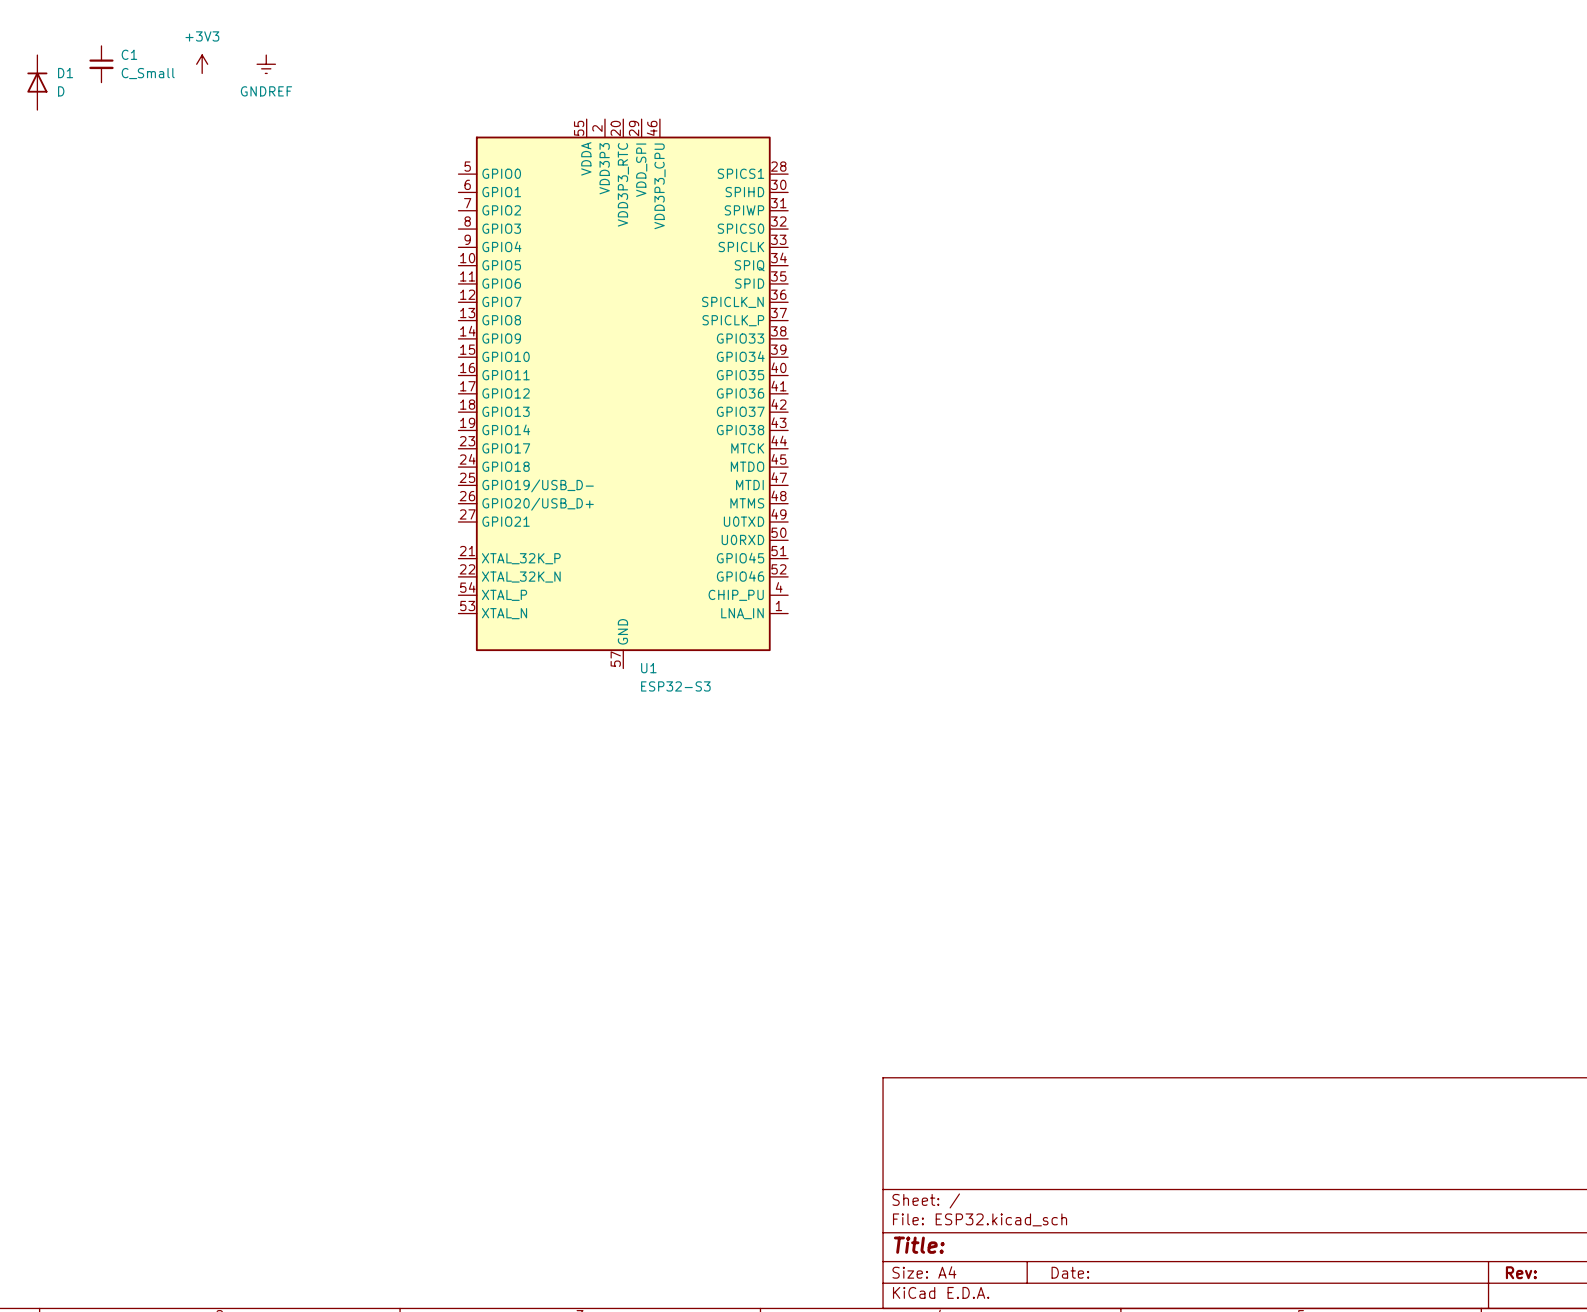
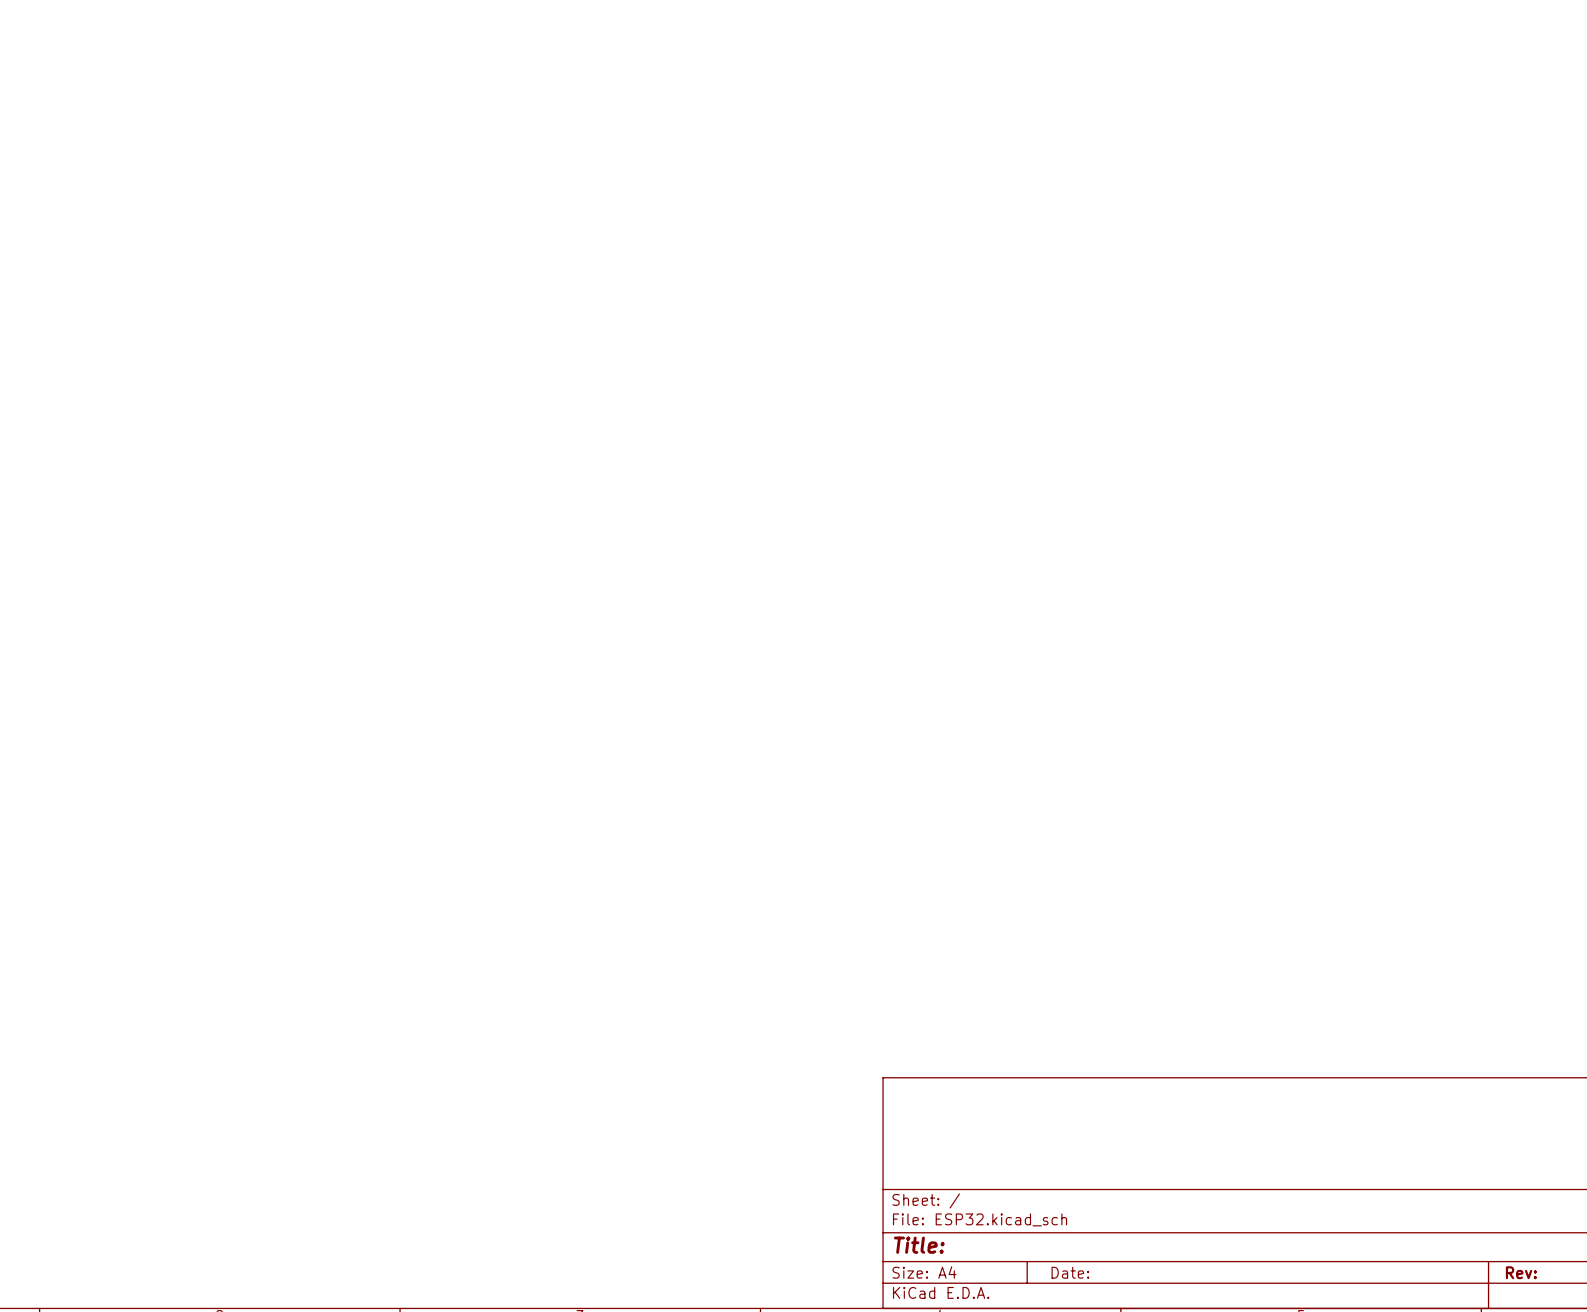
C1: C_Small (101, 64) -> none
power symbol: +3V3 (202, 64) -> none
power symbol: GNDREF (266, 64) -> none
D1: D (37, 82) -> none
U1: ESP32-S3 (623, 393) -> none

